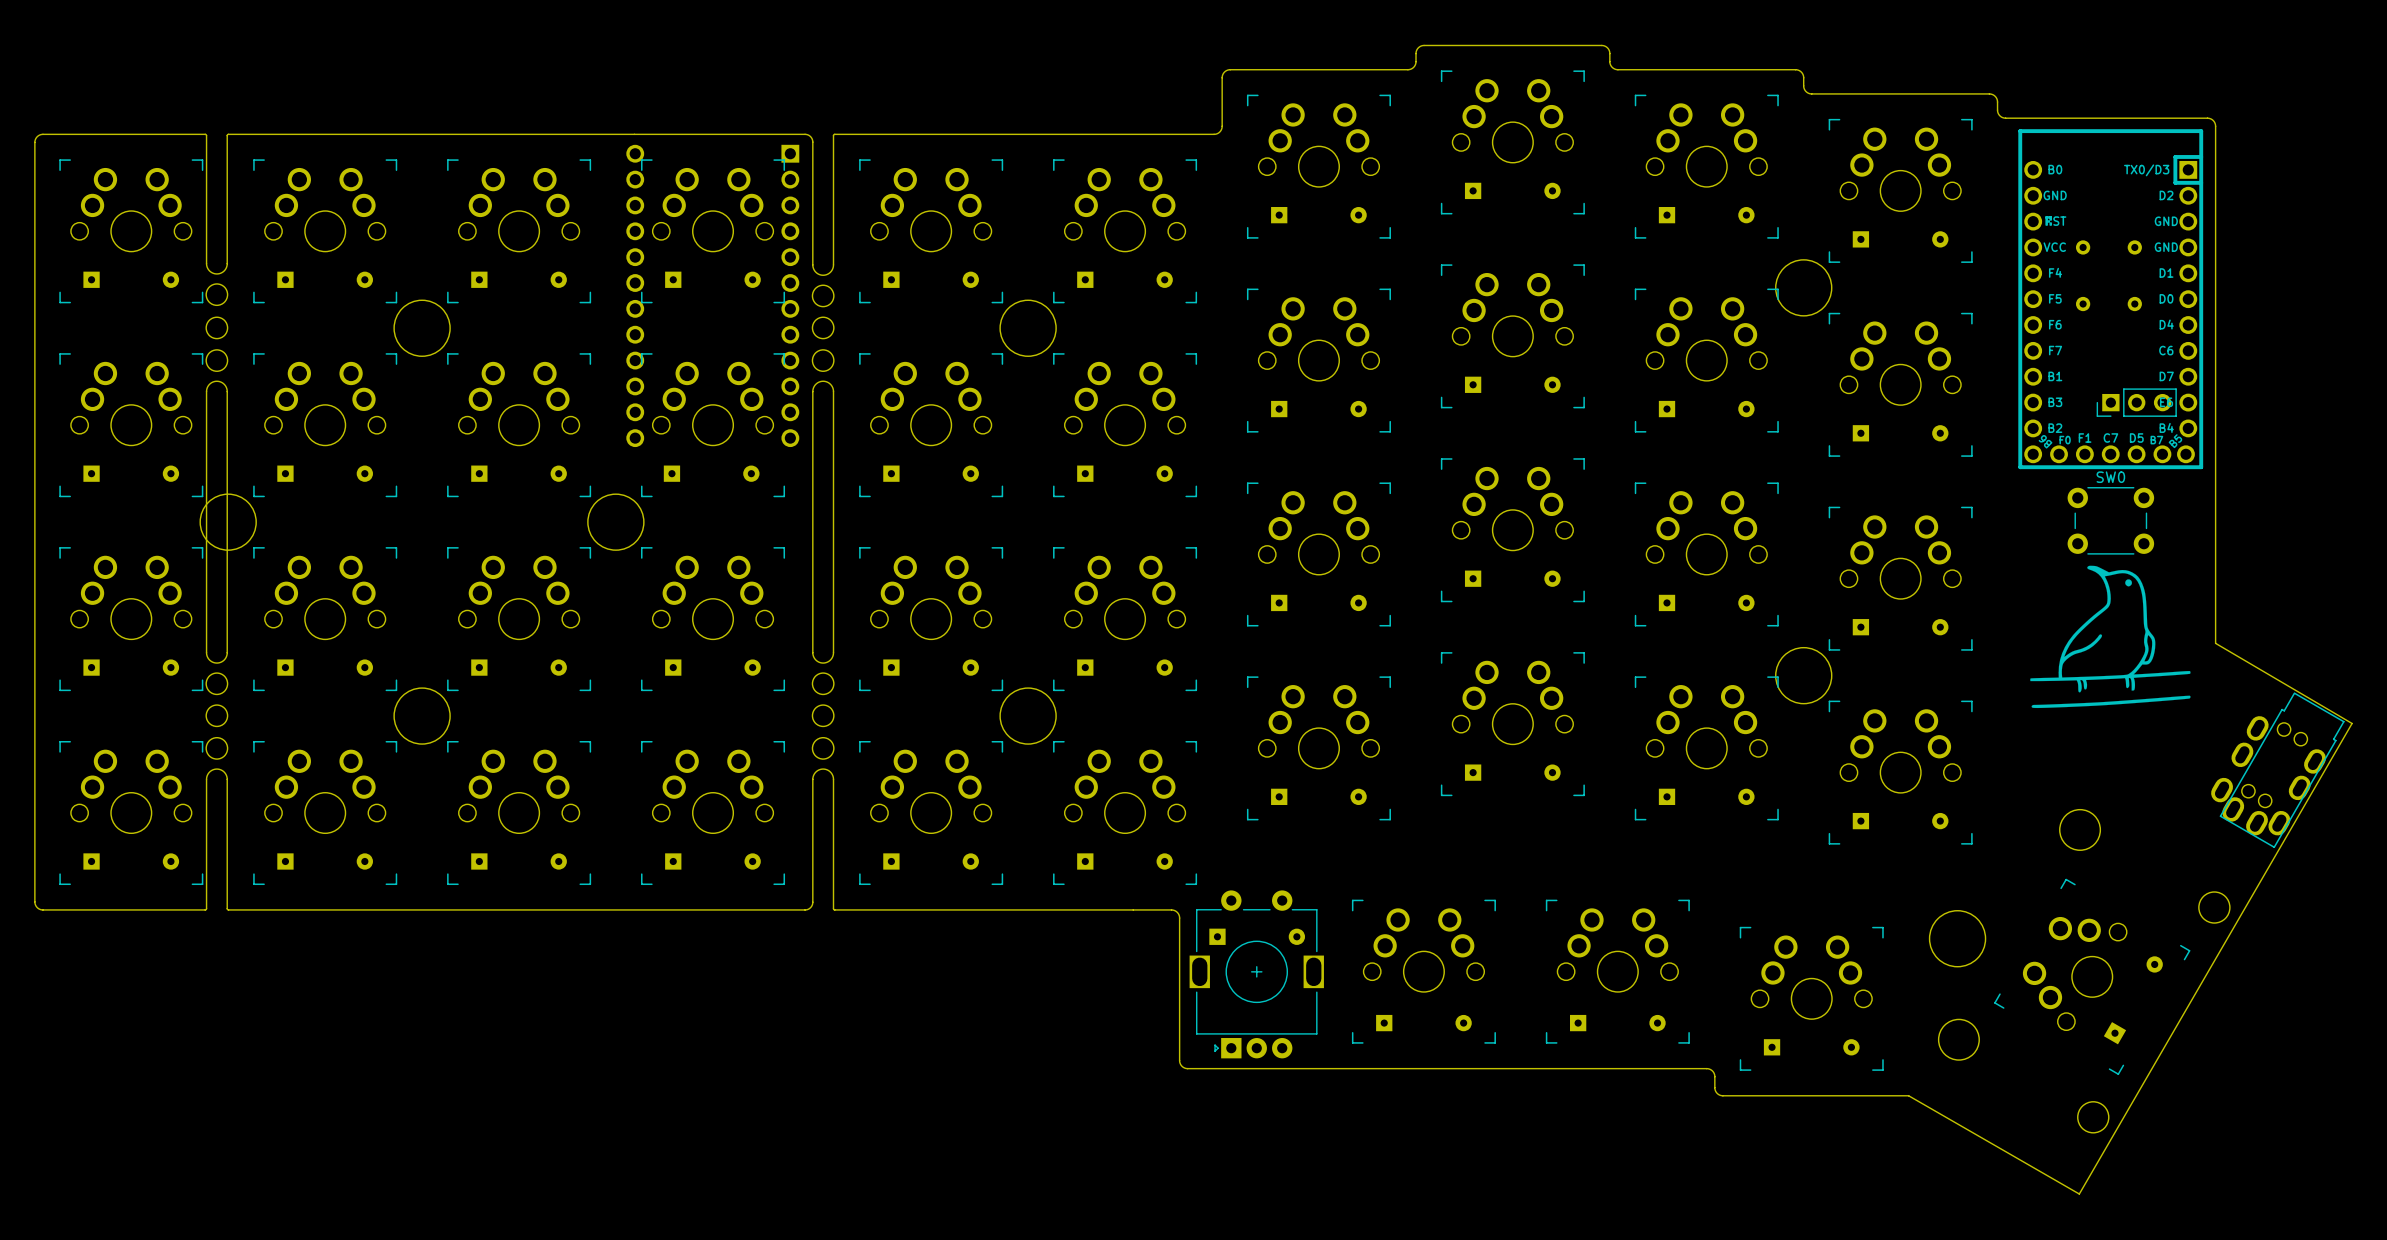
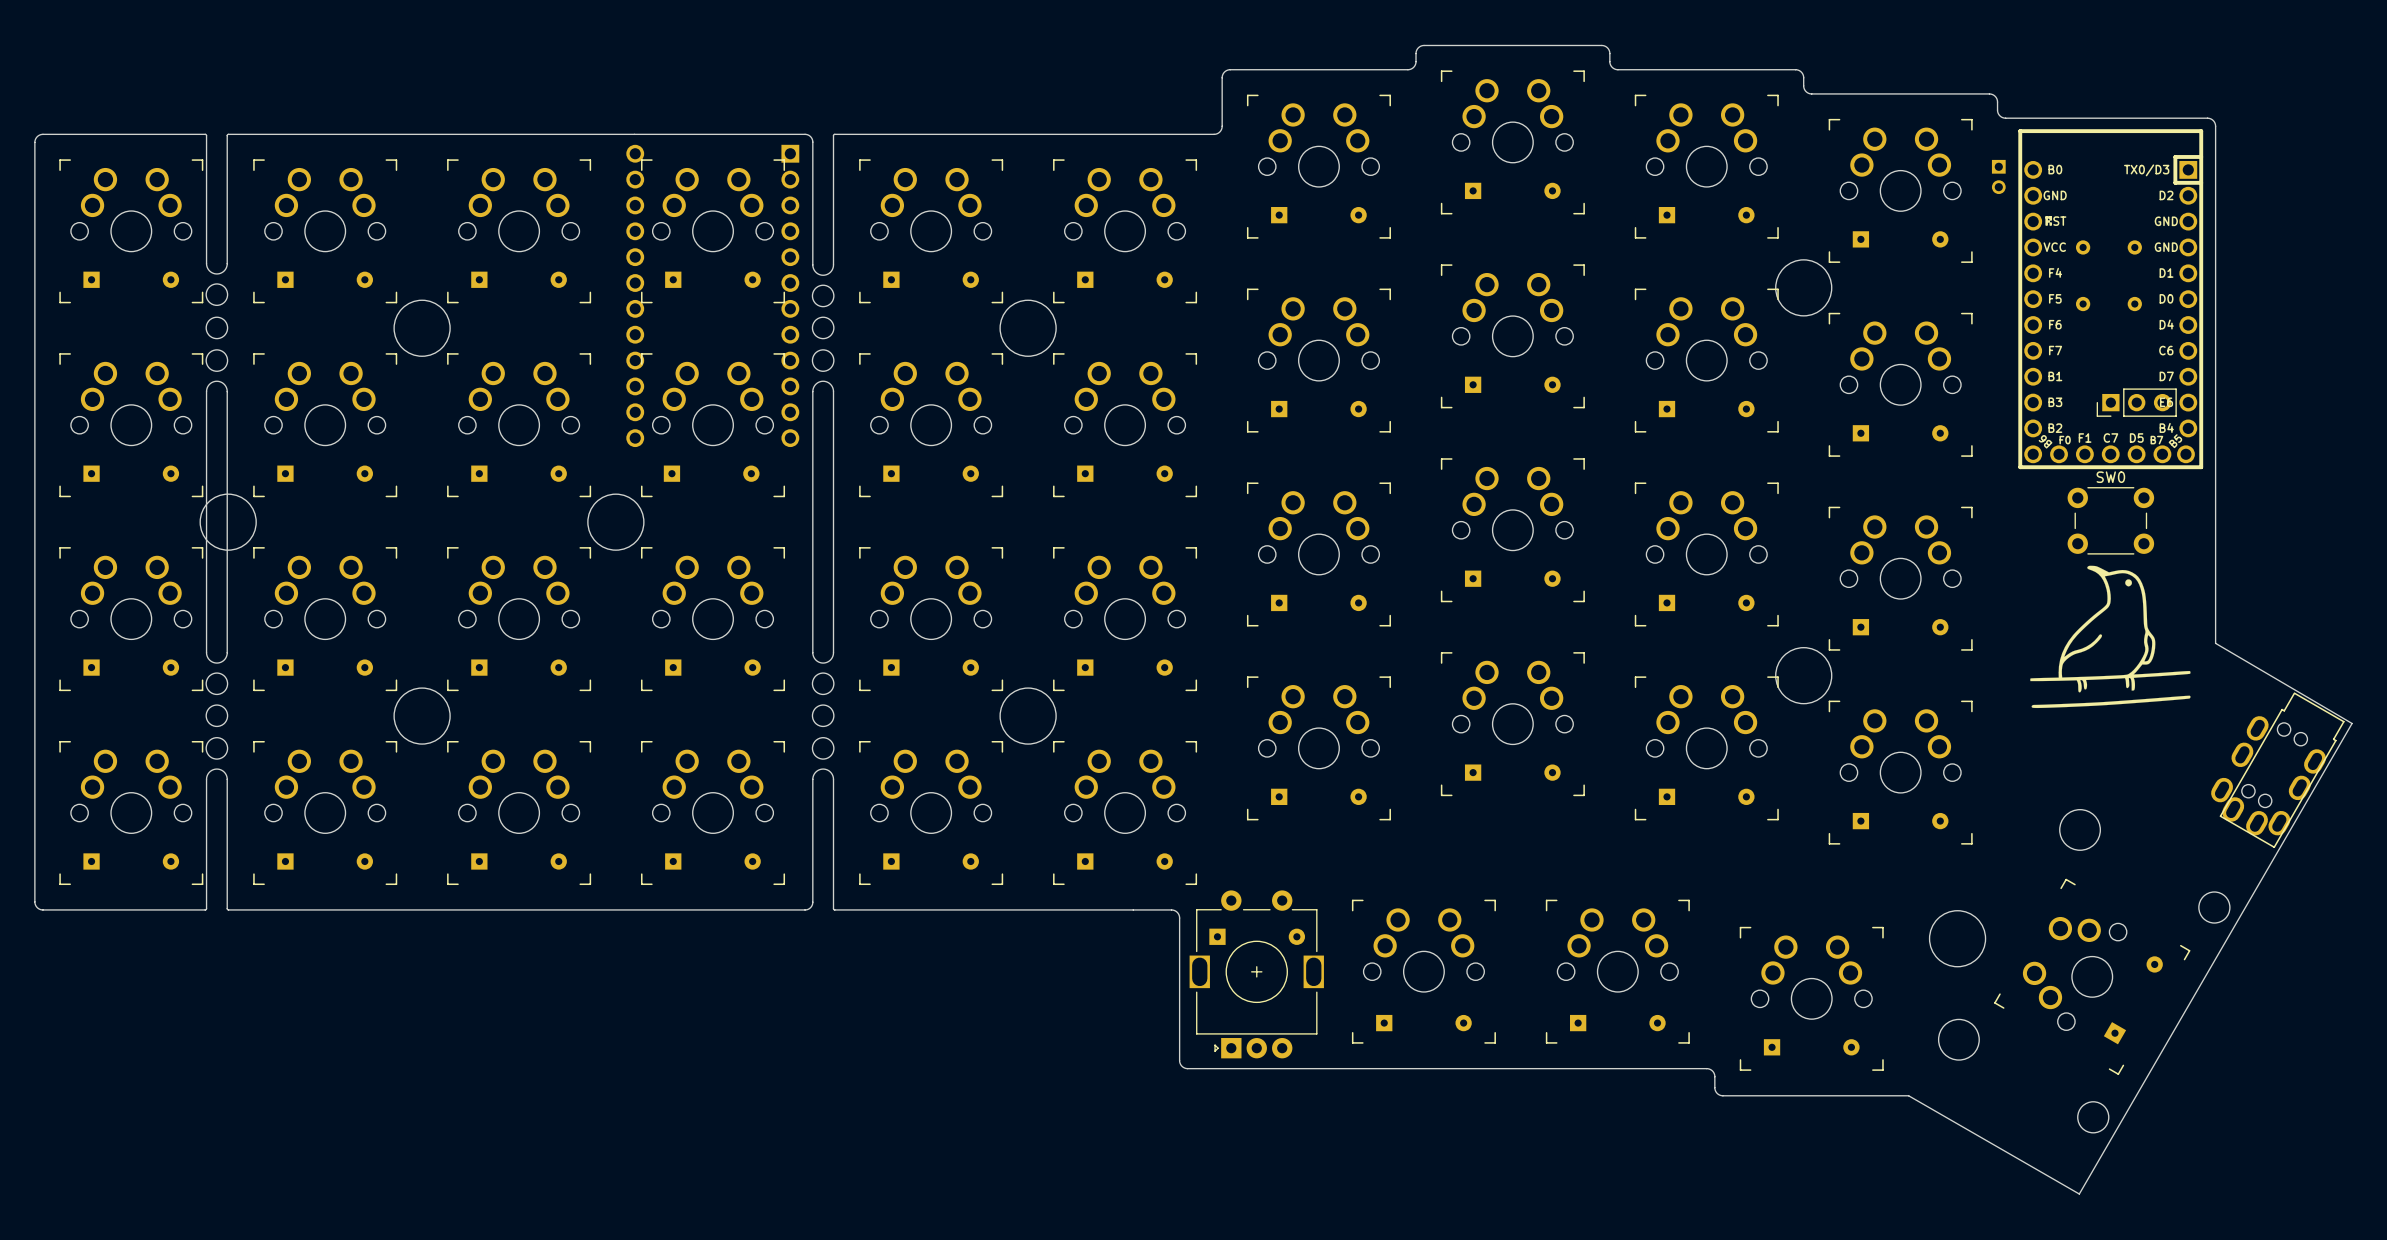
part: none -> (1998, 176)

